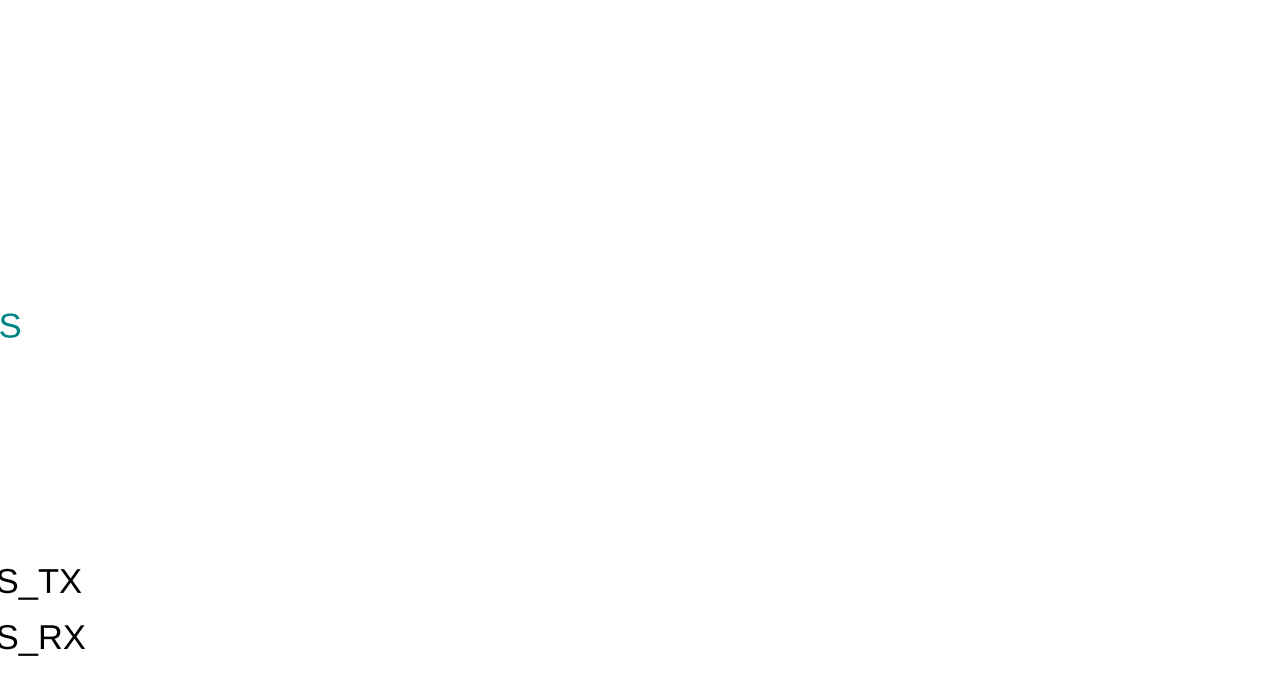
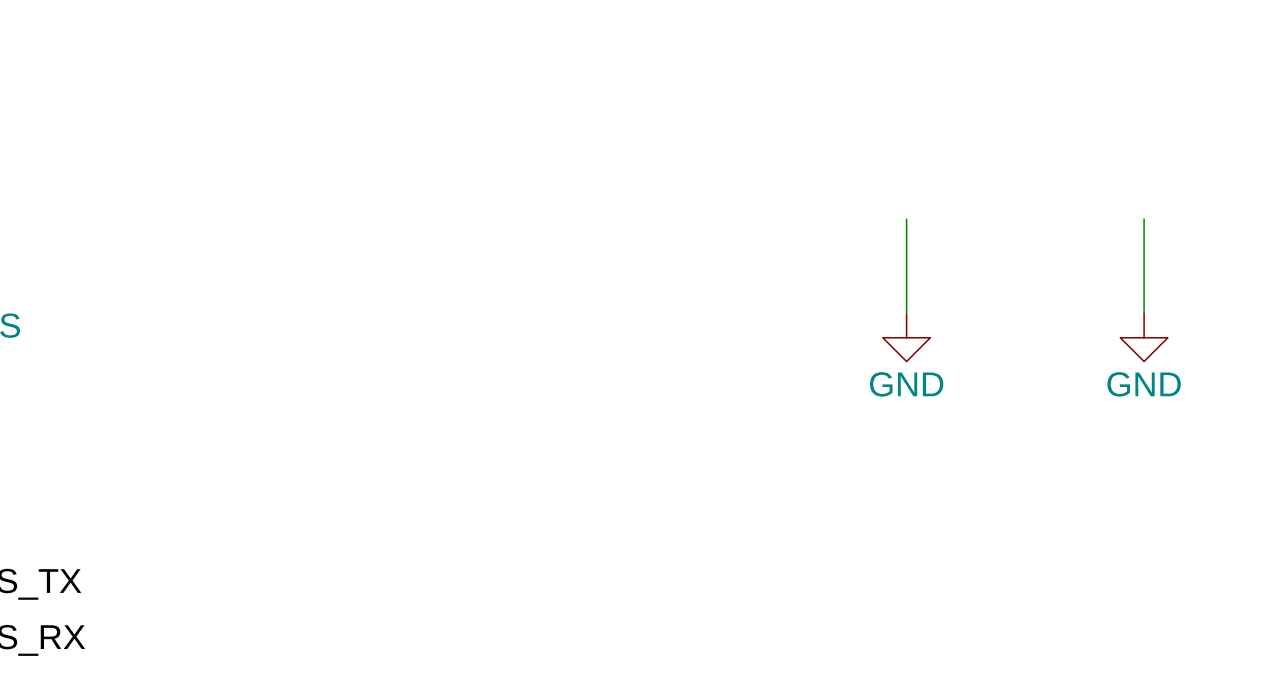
wire: none -> (906, 219) (906, 314)
wire: none -> (1144, 219) (1144, 314)
power symbol: none -> GND (906, 337)
power symbol: none -> GND (1144, 337)

